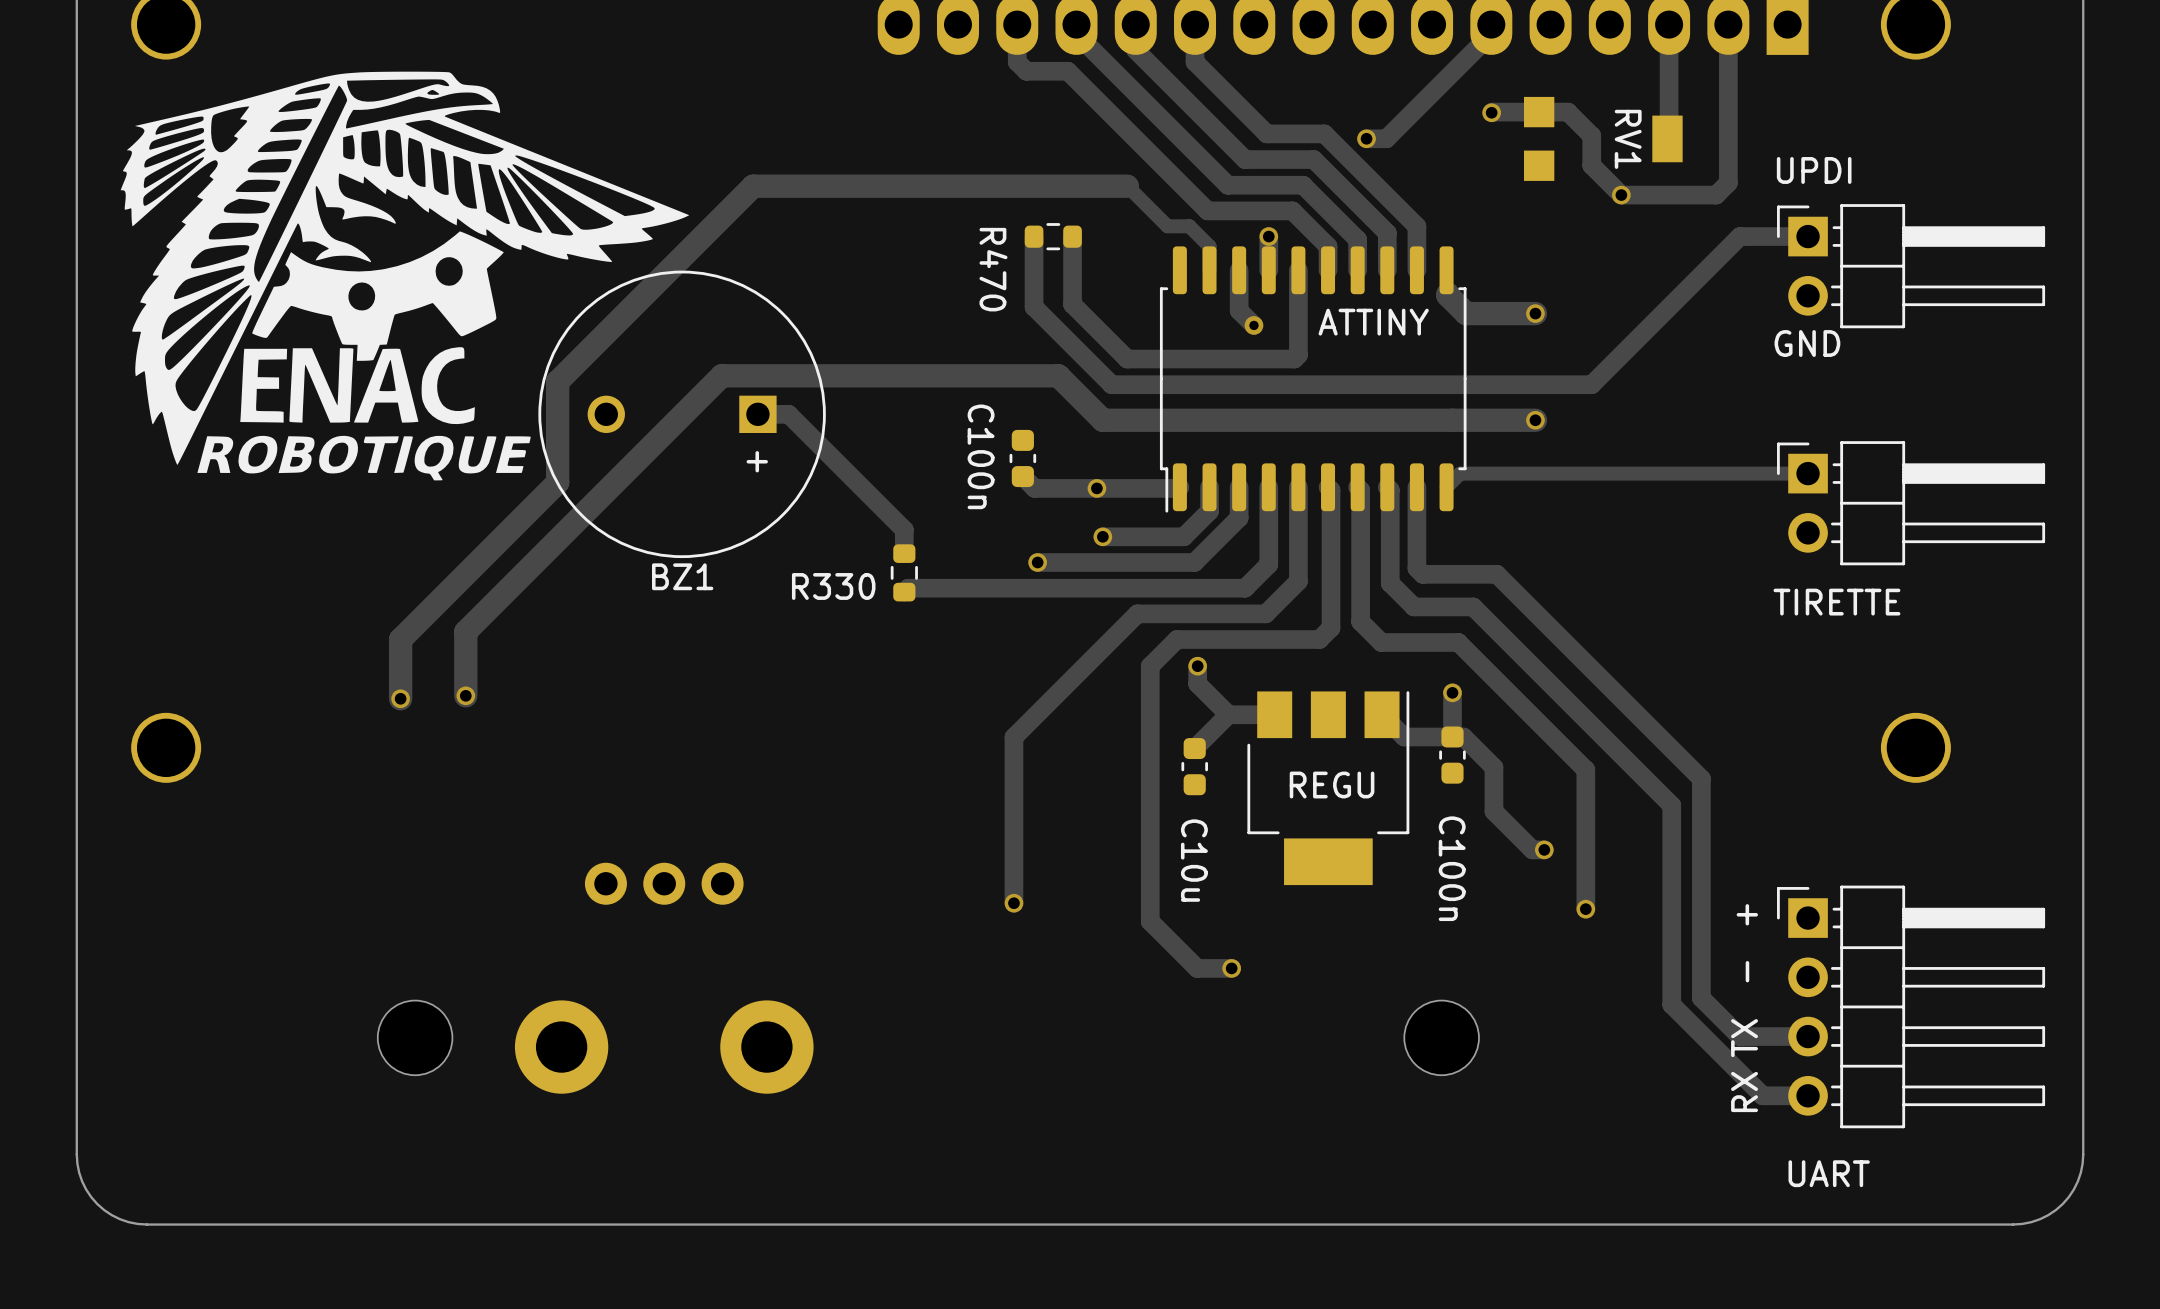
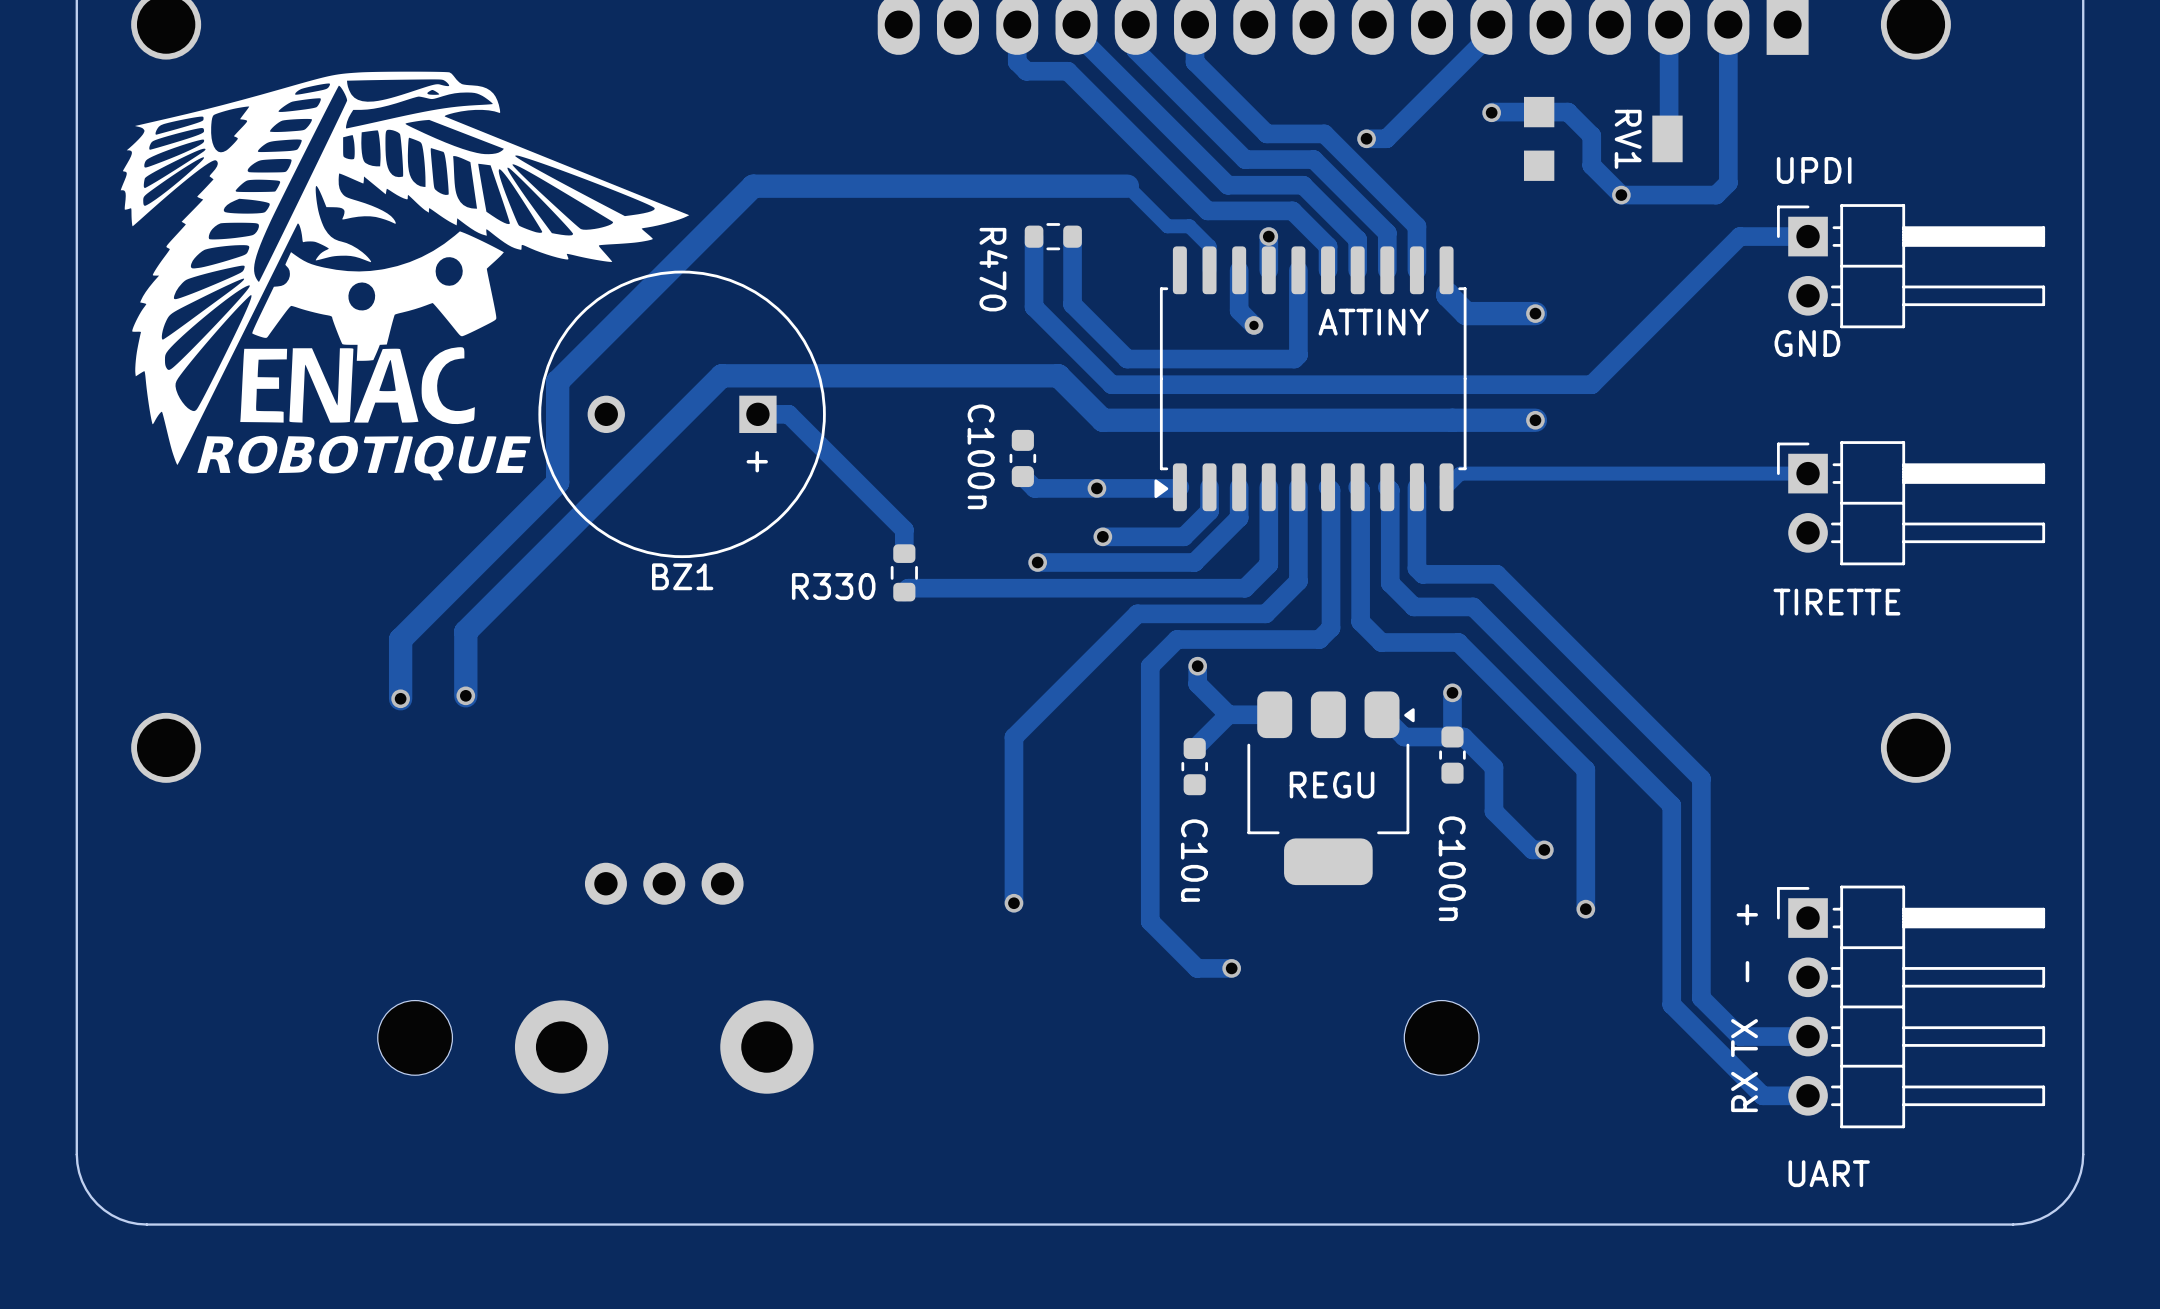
part footprint: [1159, 246, 1467, 513] -> [1154, 246, 1467, 512]
part footprint: [1247, 691, 1410, 886] -> [1247, 691, 1415, 886]

